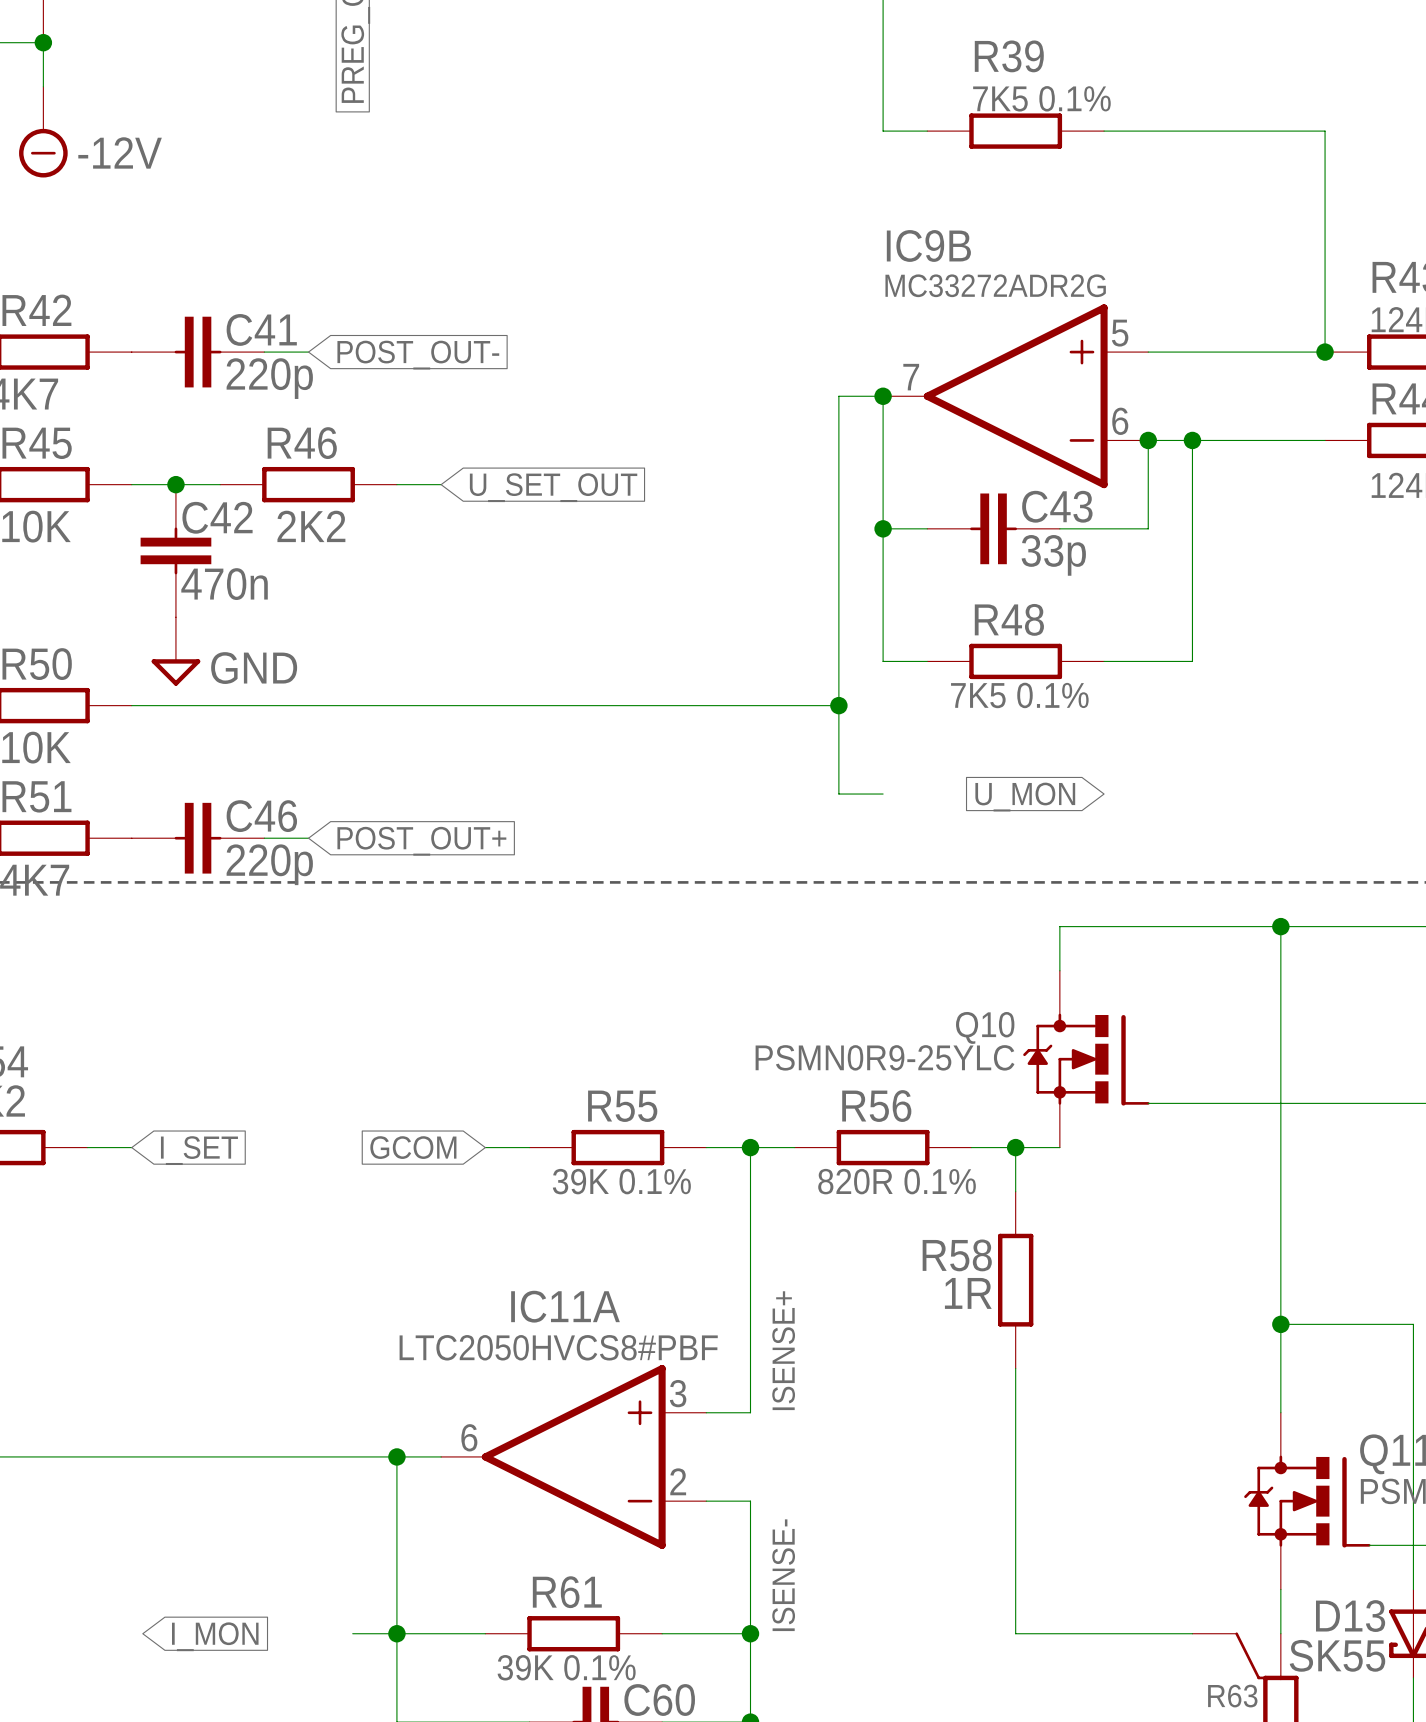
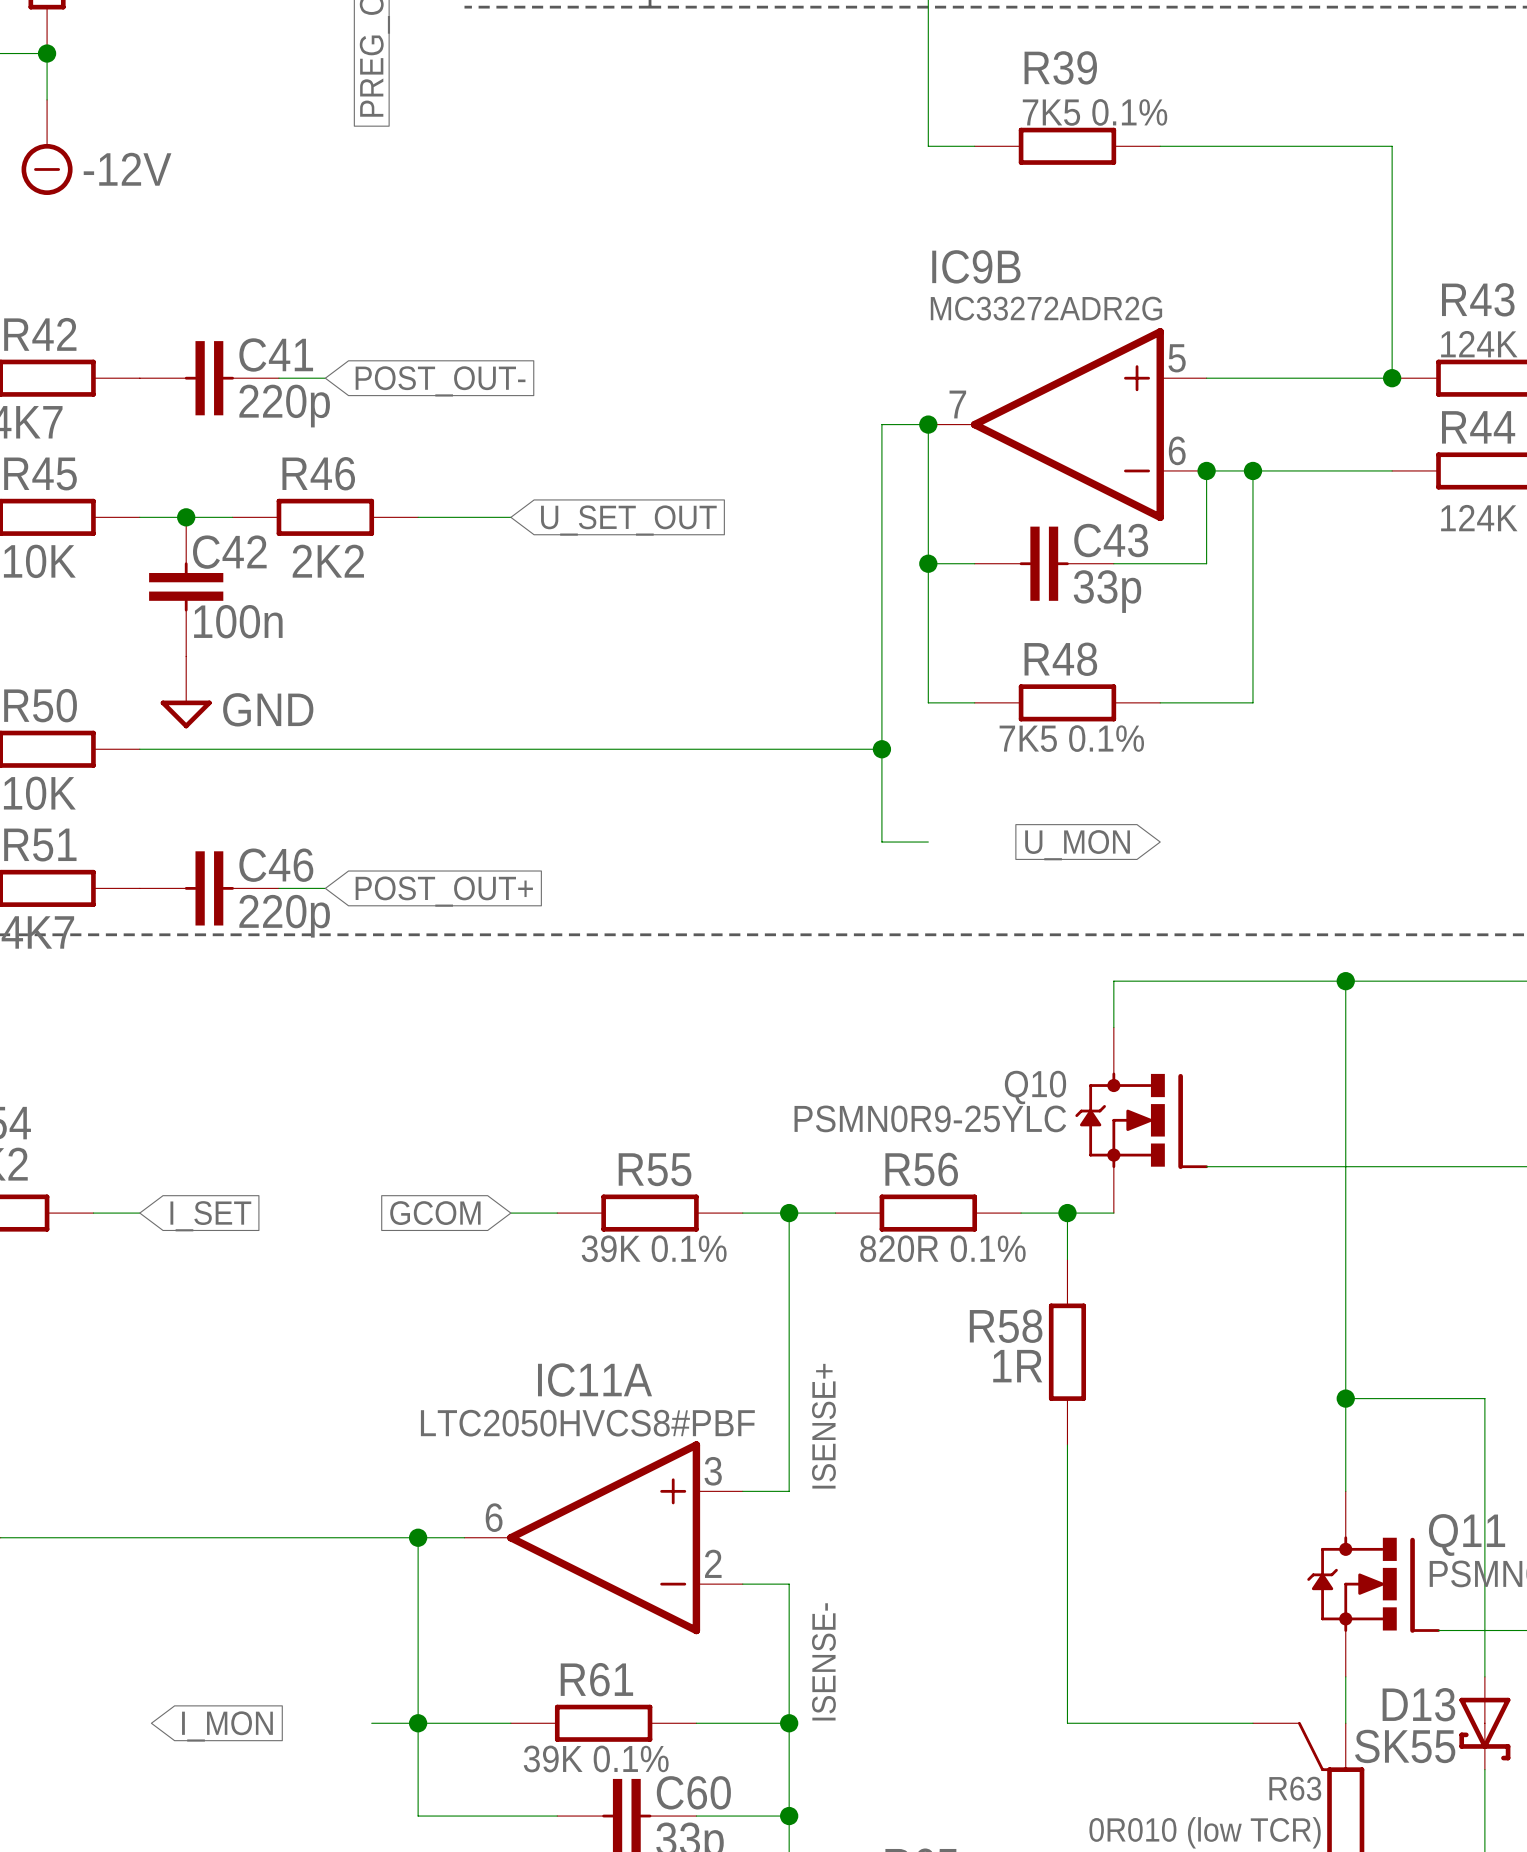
wire: none -> (464, 517) (510, 517)
global label position: U_SET_OUT (553, 487) -> U_SET_OUT (628, 520)
C42 value: 470n (224, 584) -> 100n (238, 621)

